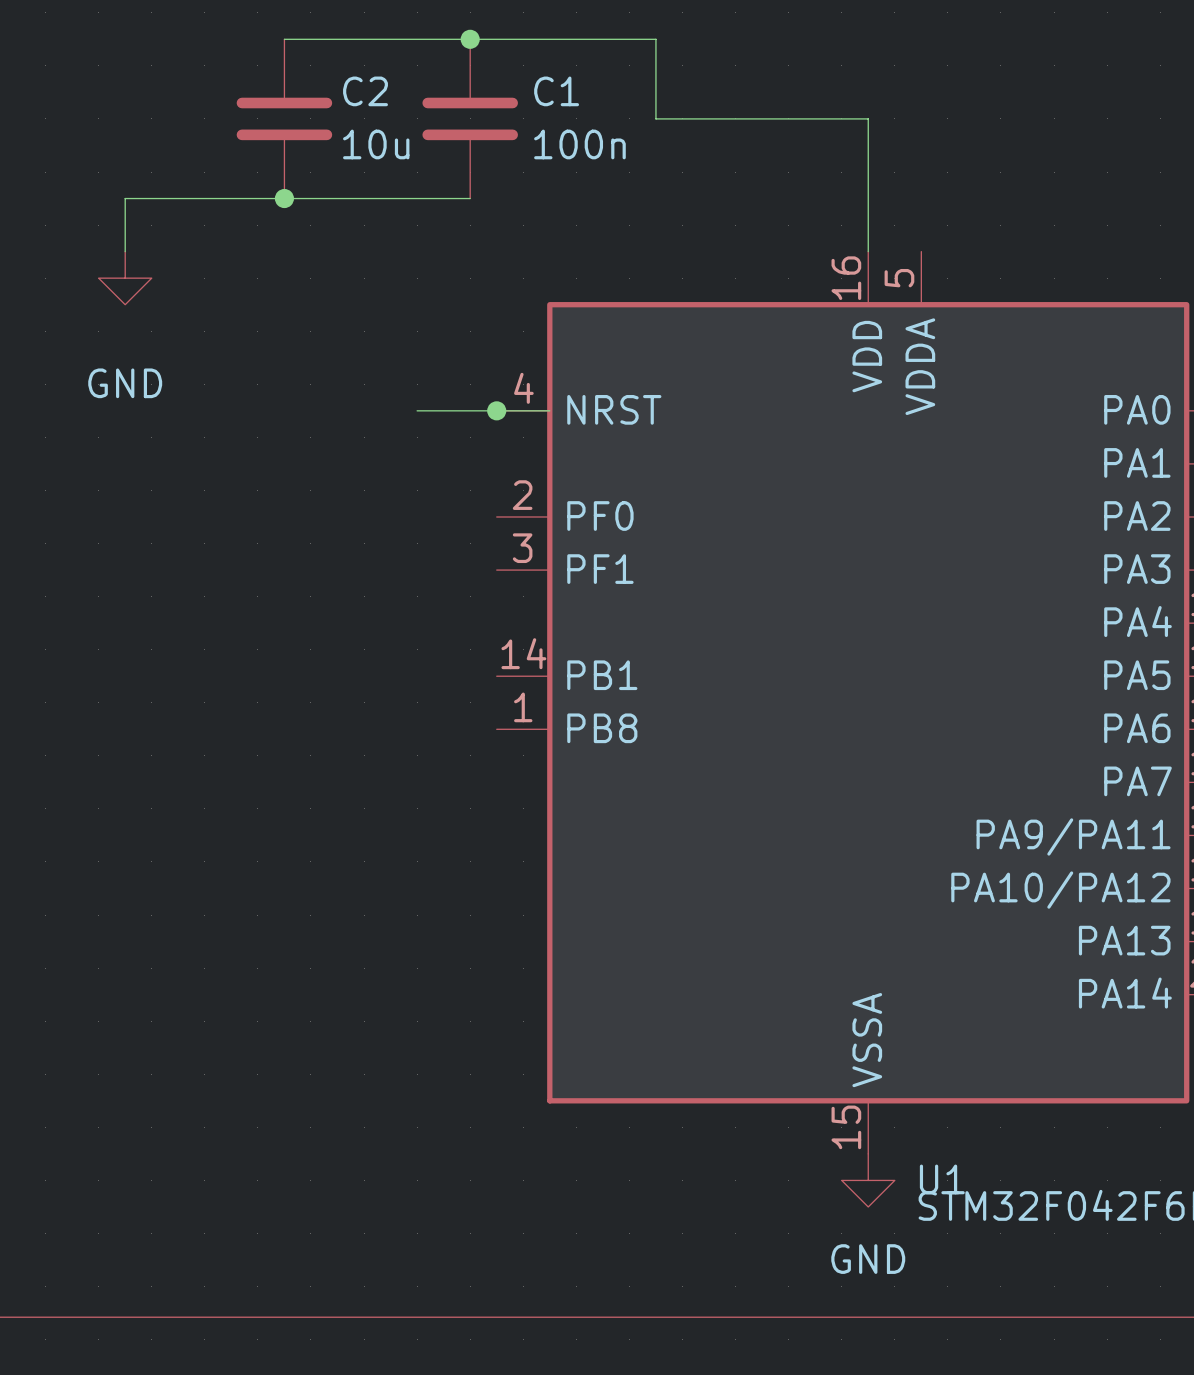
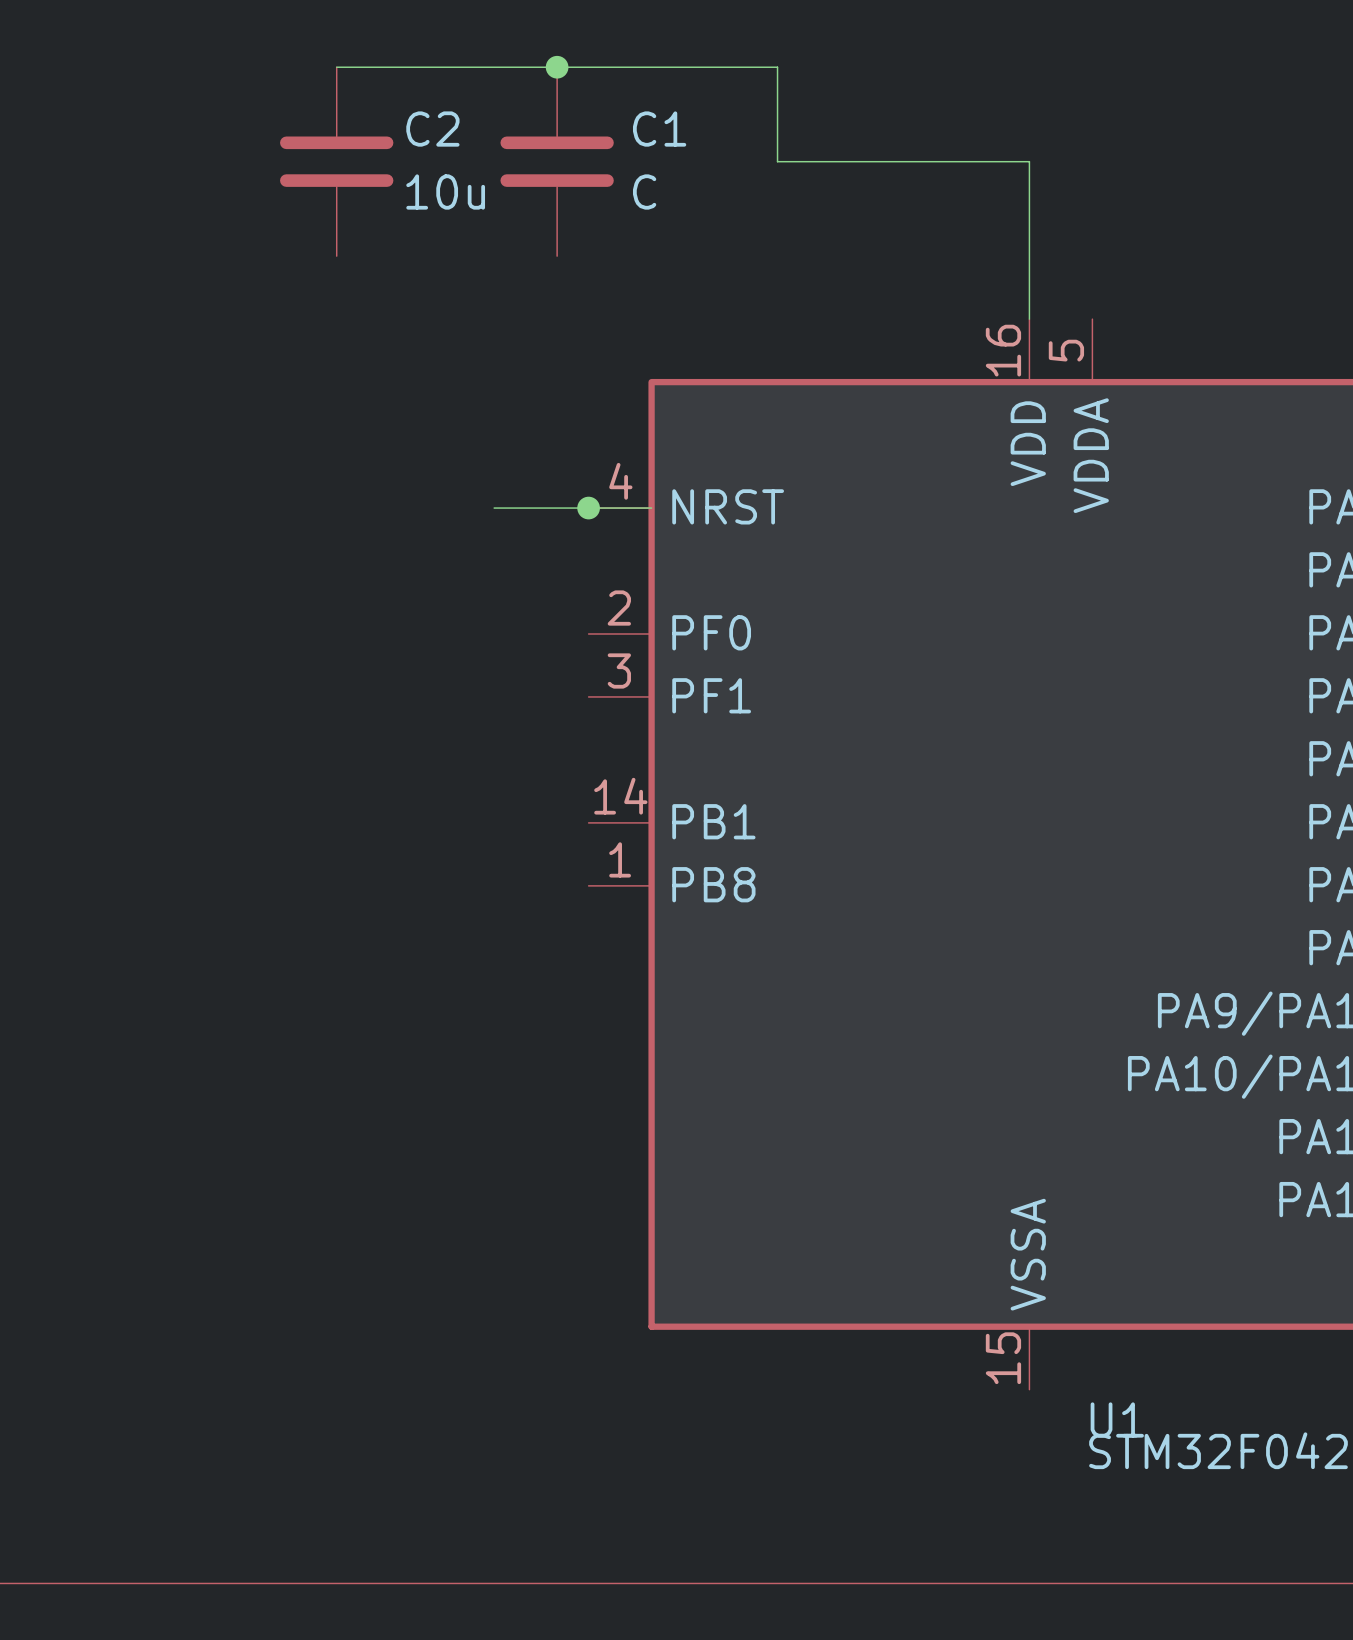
C1 value: 100n (579, 144) -> C (644, 192)
junction: (284, 198) -> none
wire: (470, 198) (125, 198) (125, 251) -> none
power symbol: GND (125, 278) -> none
power symbol: GND (868, 1180) -> none

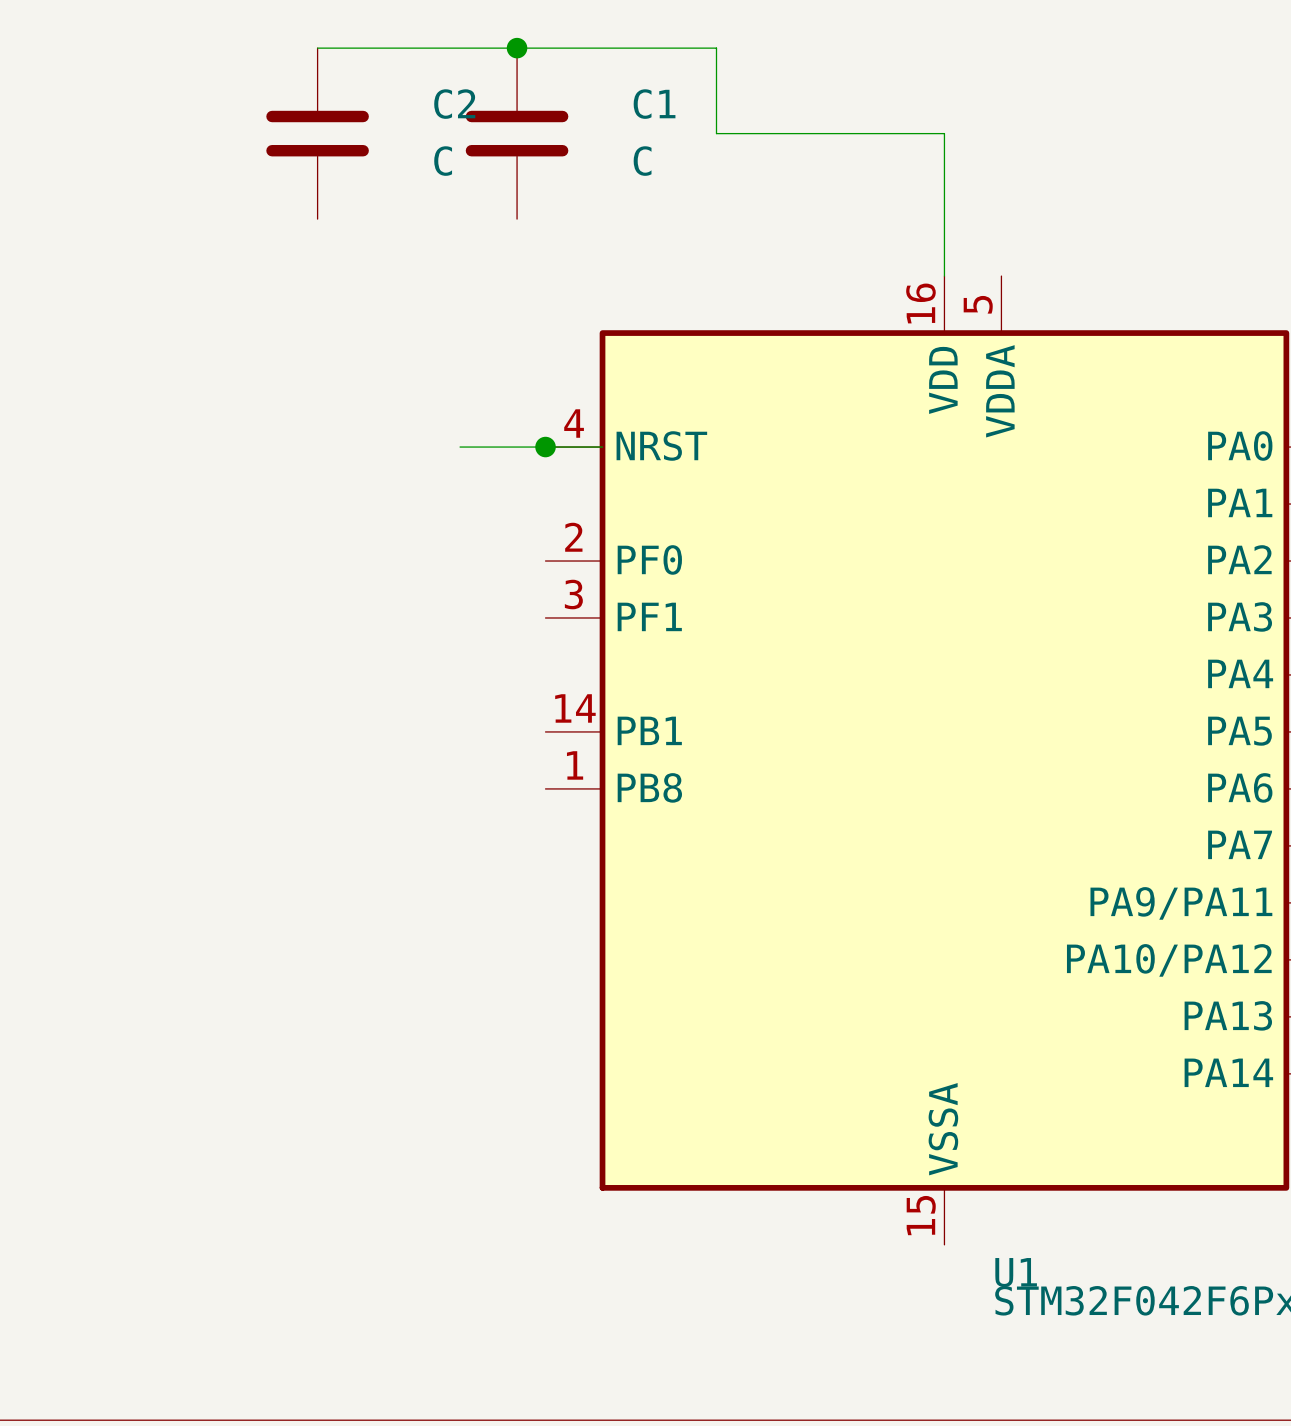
C2 name position: C2 (432, 129) -> C2 (454, 104)
C1 name position: C1 (659, 129) -> C1 (654, 104)
C2 value: 10u (445, 192) -> C (443, 161)
C1 value position: C (644, 192) -> C (642, 161)

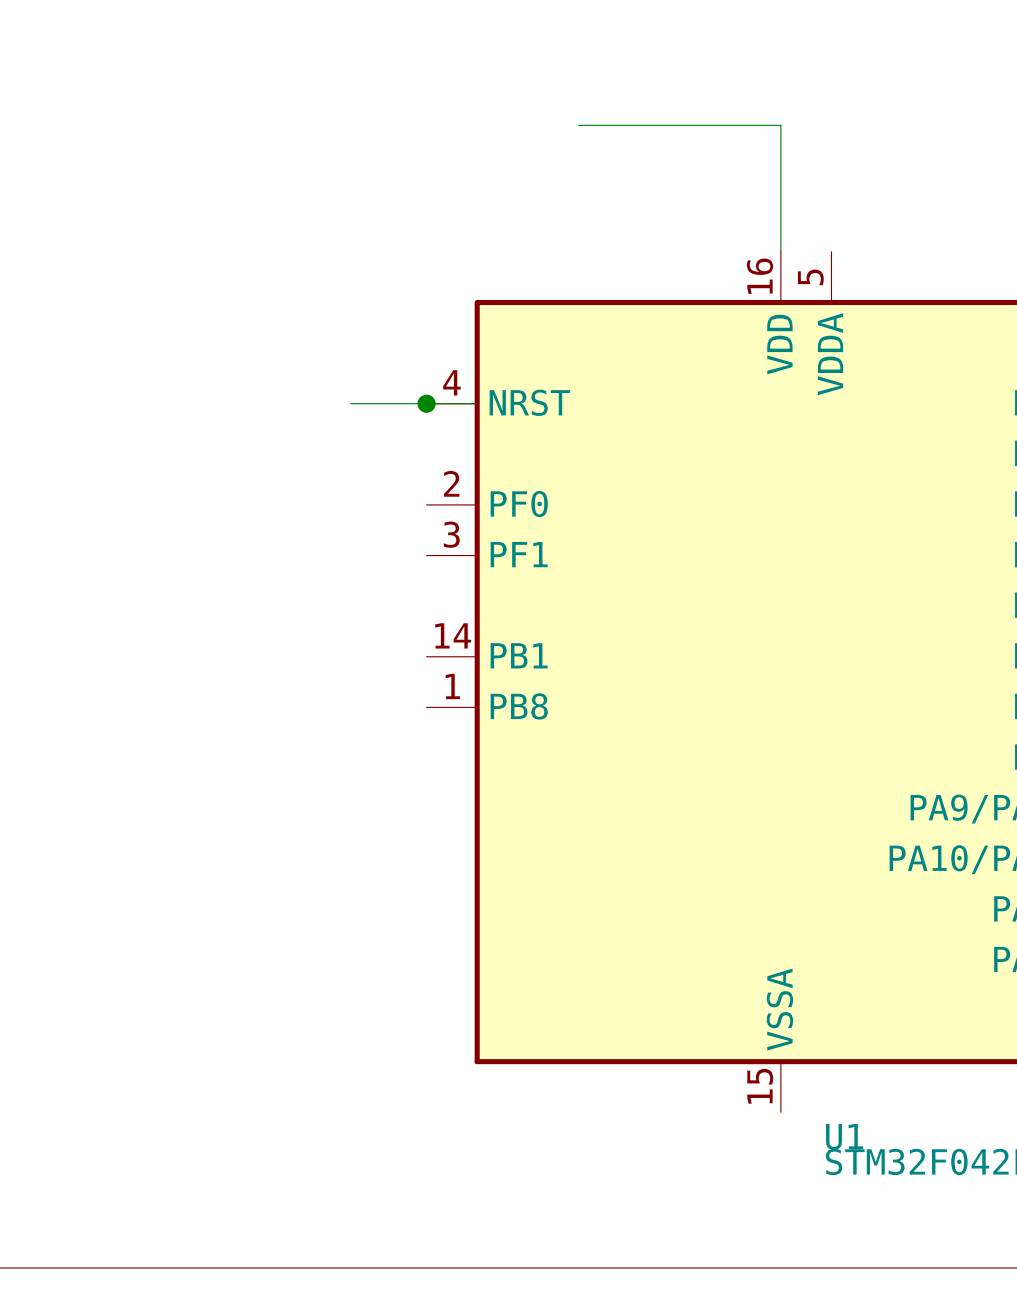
wire: (317, 48) (716, 48) (716, 133) -> none
junction: (517, 48) -> none
C2: C (317, 133) -> none
C1: C (517, 133) -> none

